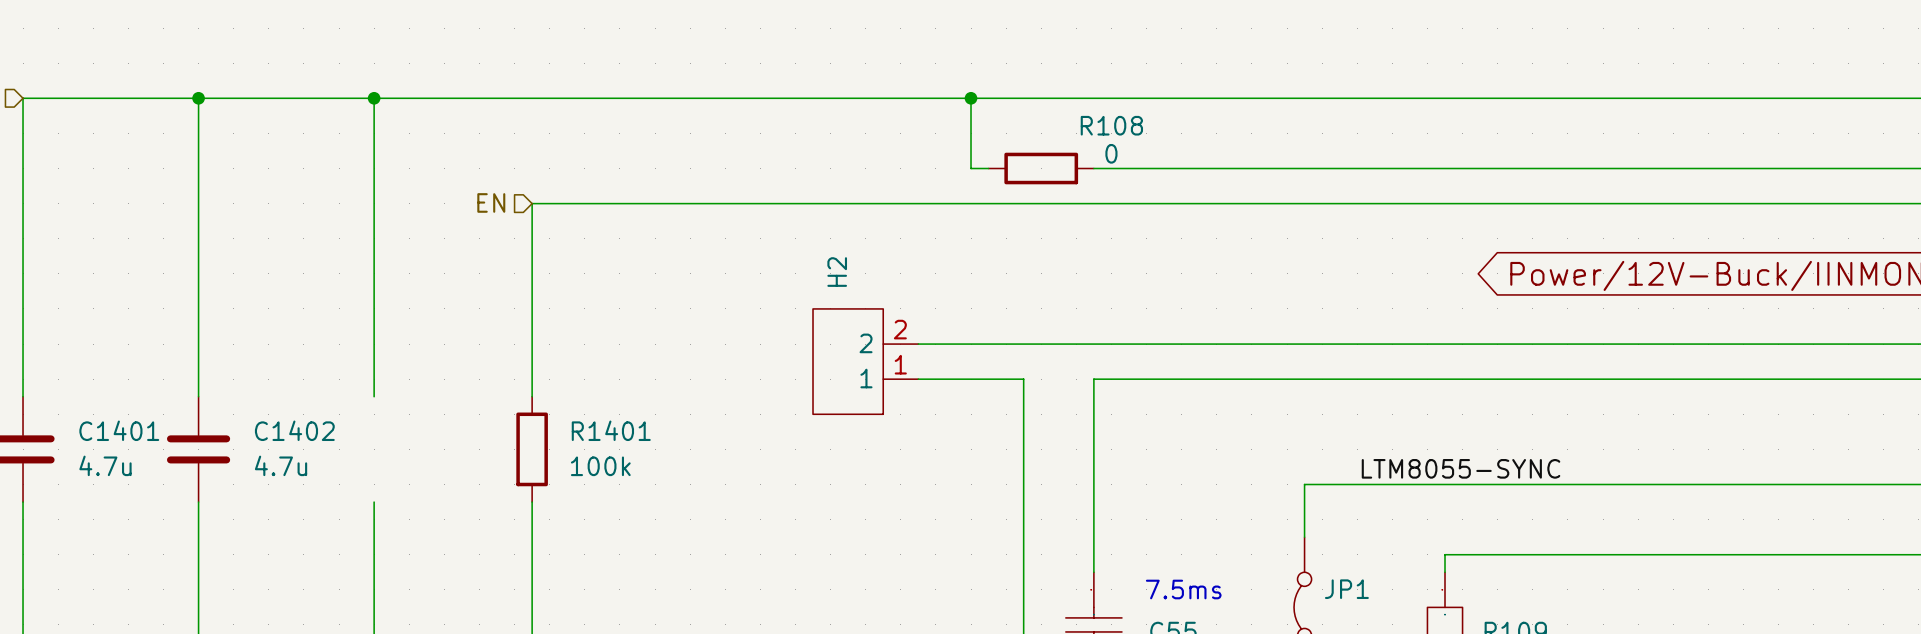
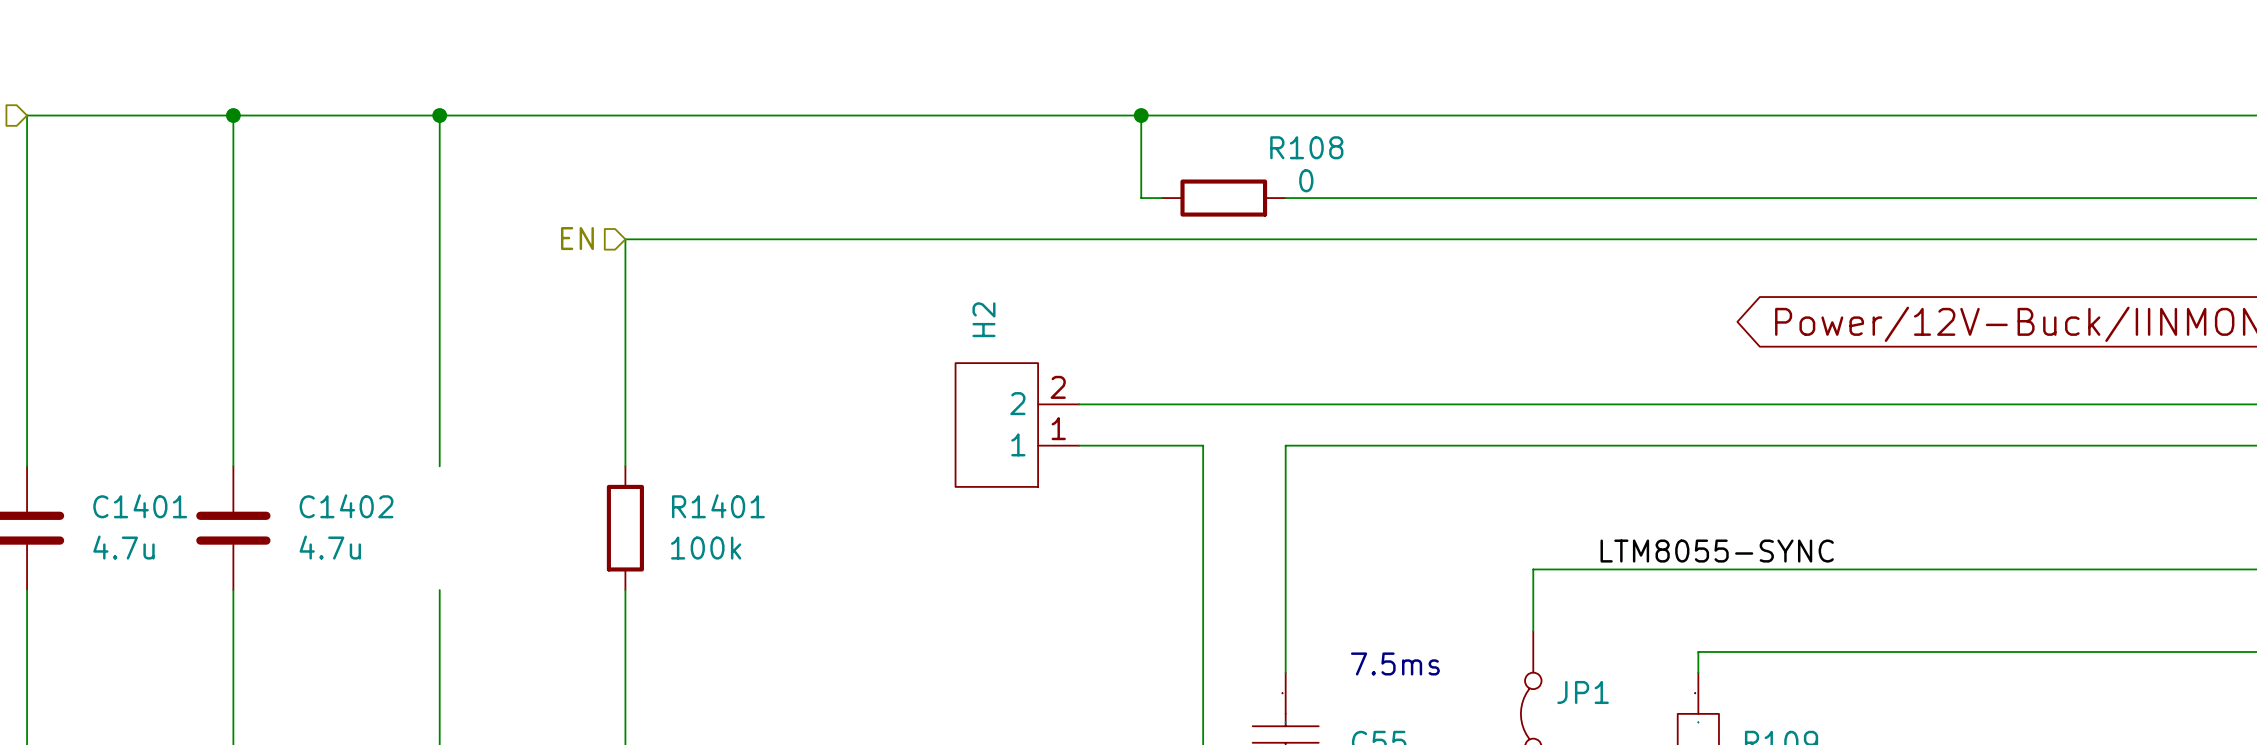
text position: 7.5ms (1183, 589) -> 7.5ms (1395, 663)

